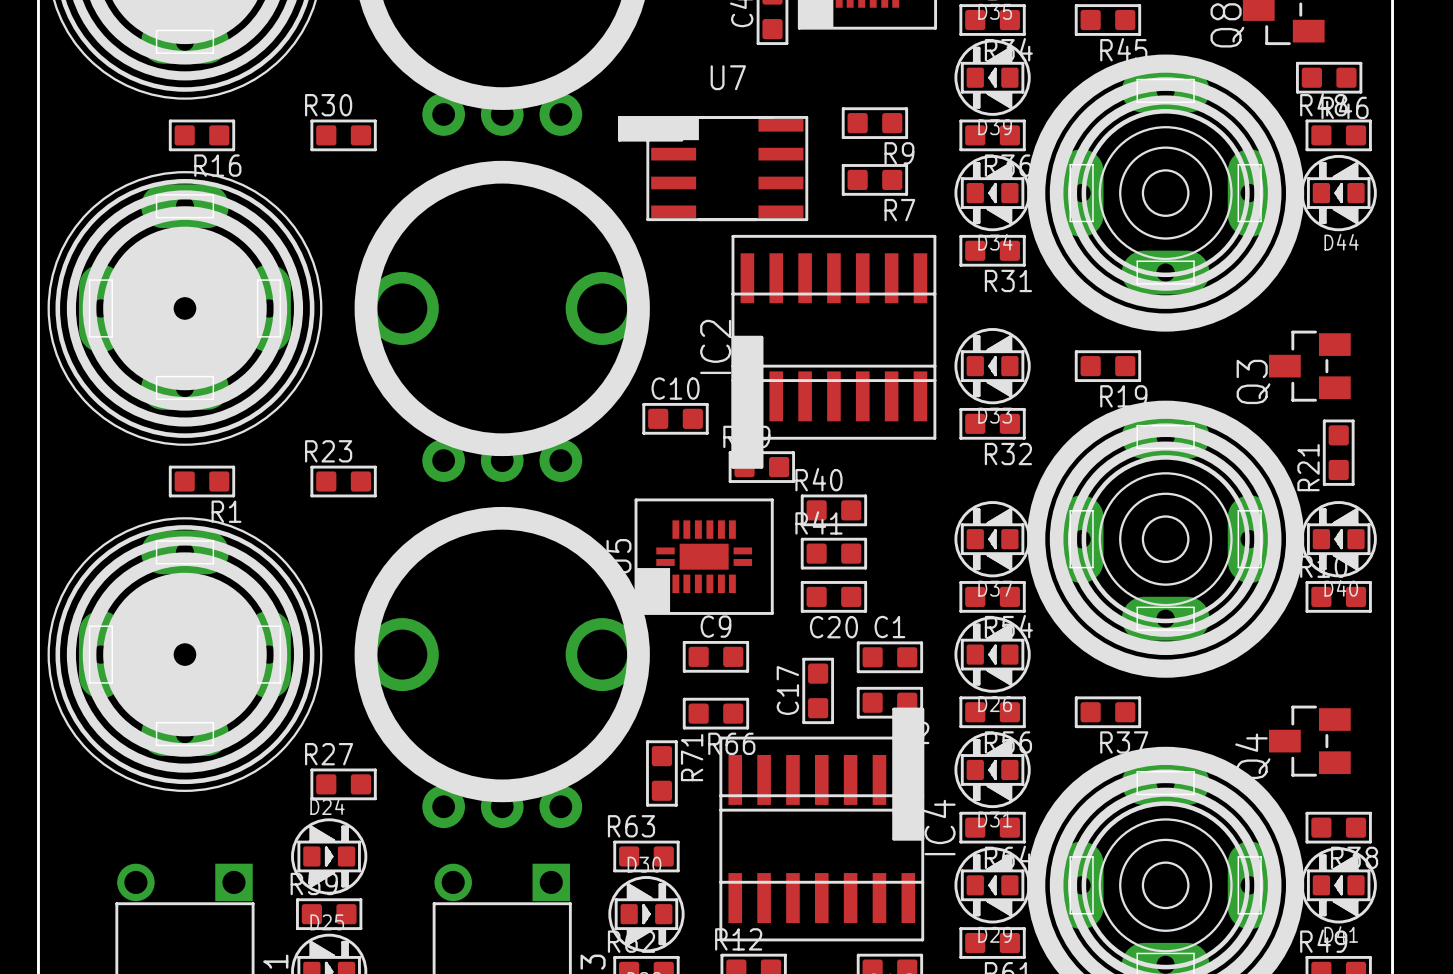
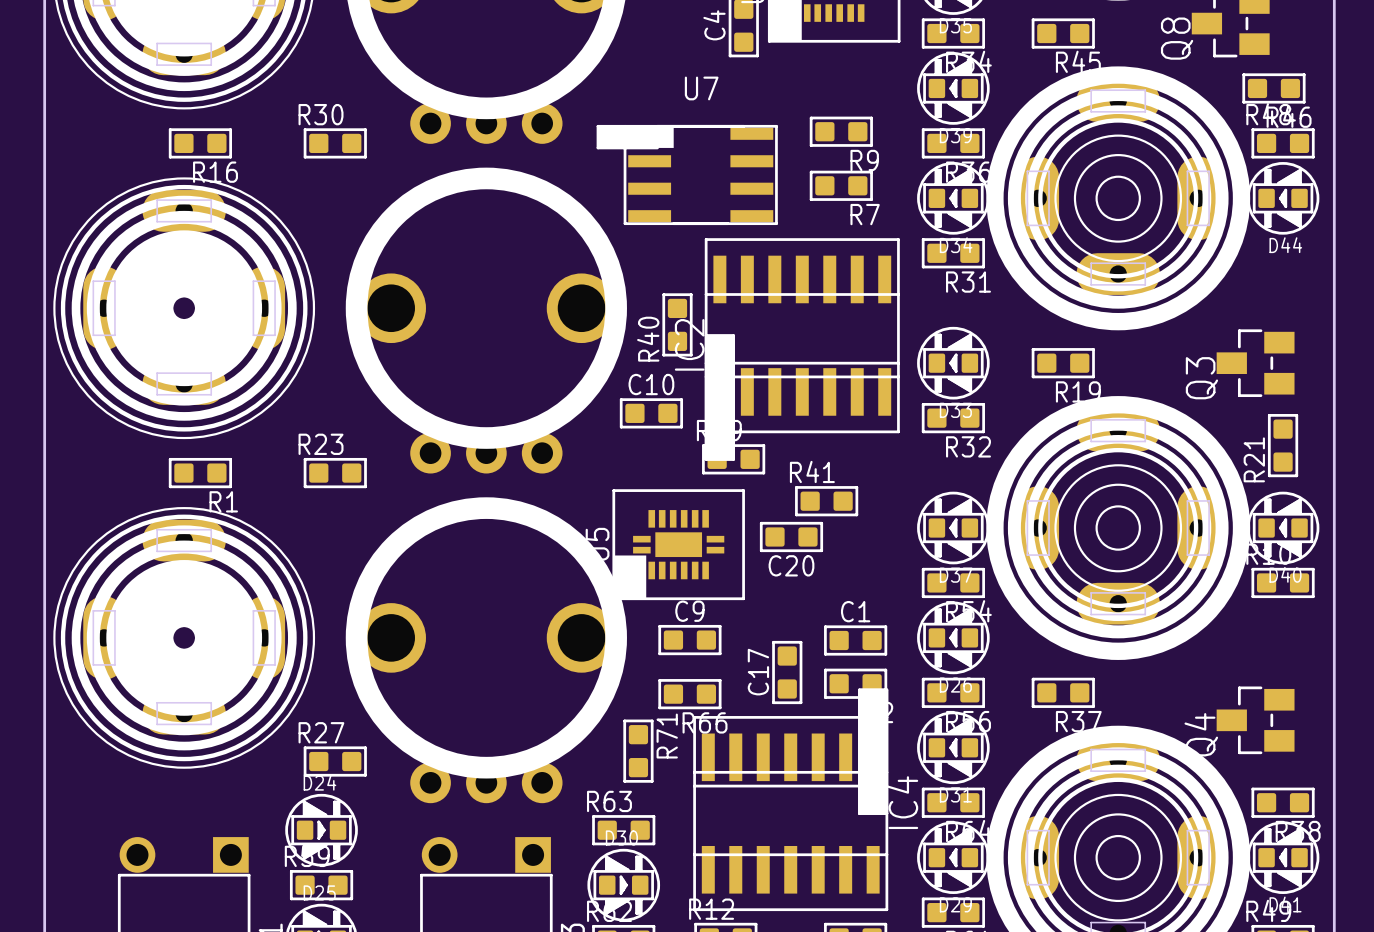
R40 rotation: 0° (833, 510) -> 90° clockwise (677, 324)
R40 position: (833, 510) -> (677, 324)
R41 position: (833, 553) -> (826, 501)
C20 position: (833, 596) -> (791, 536)

